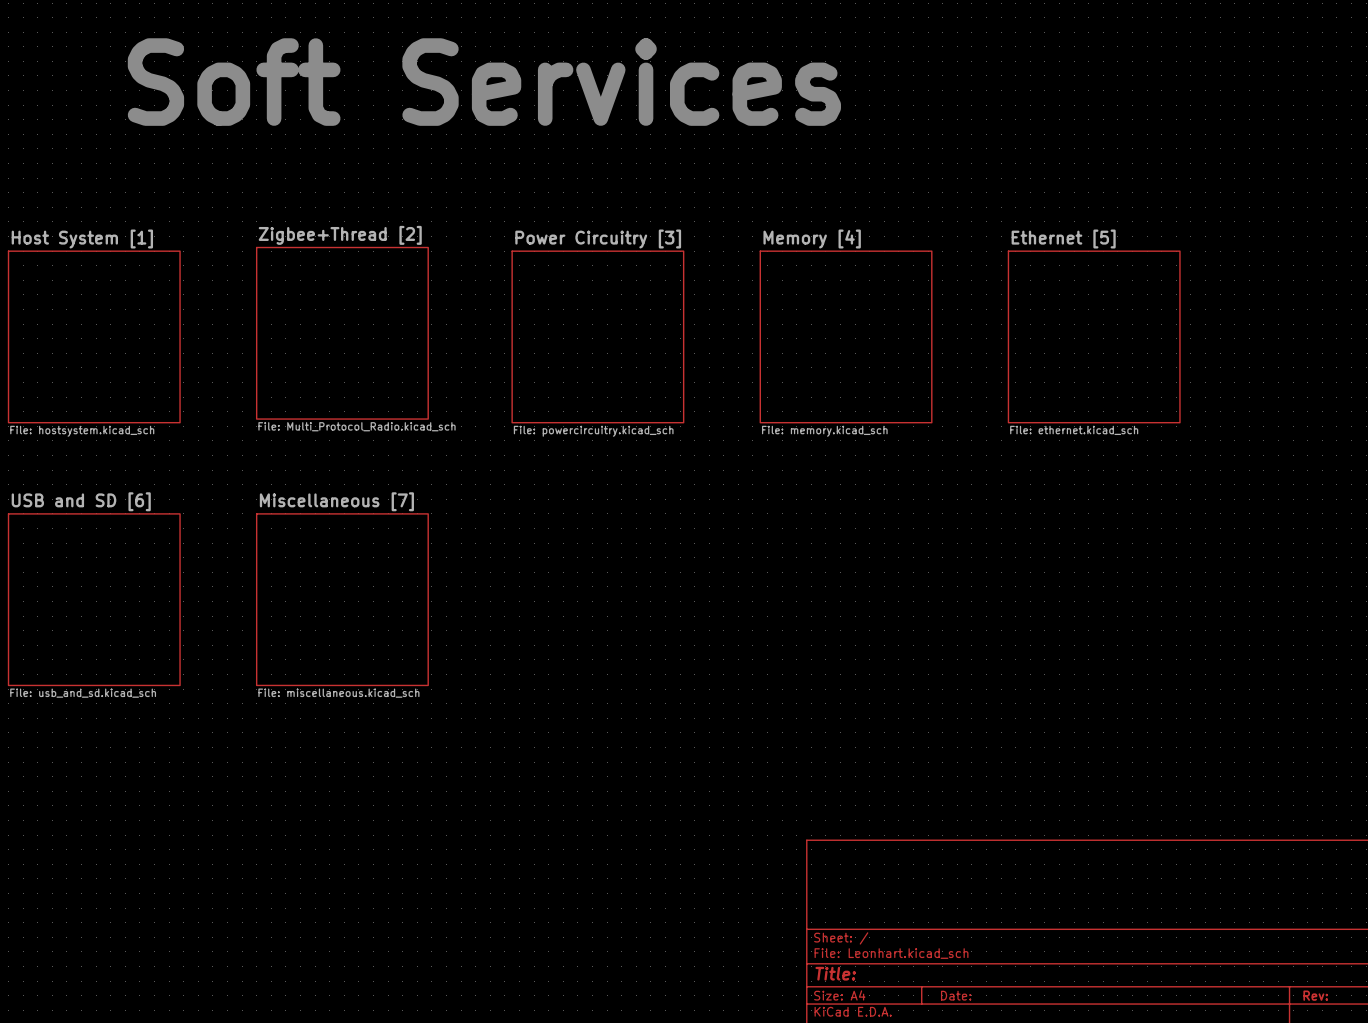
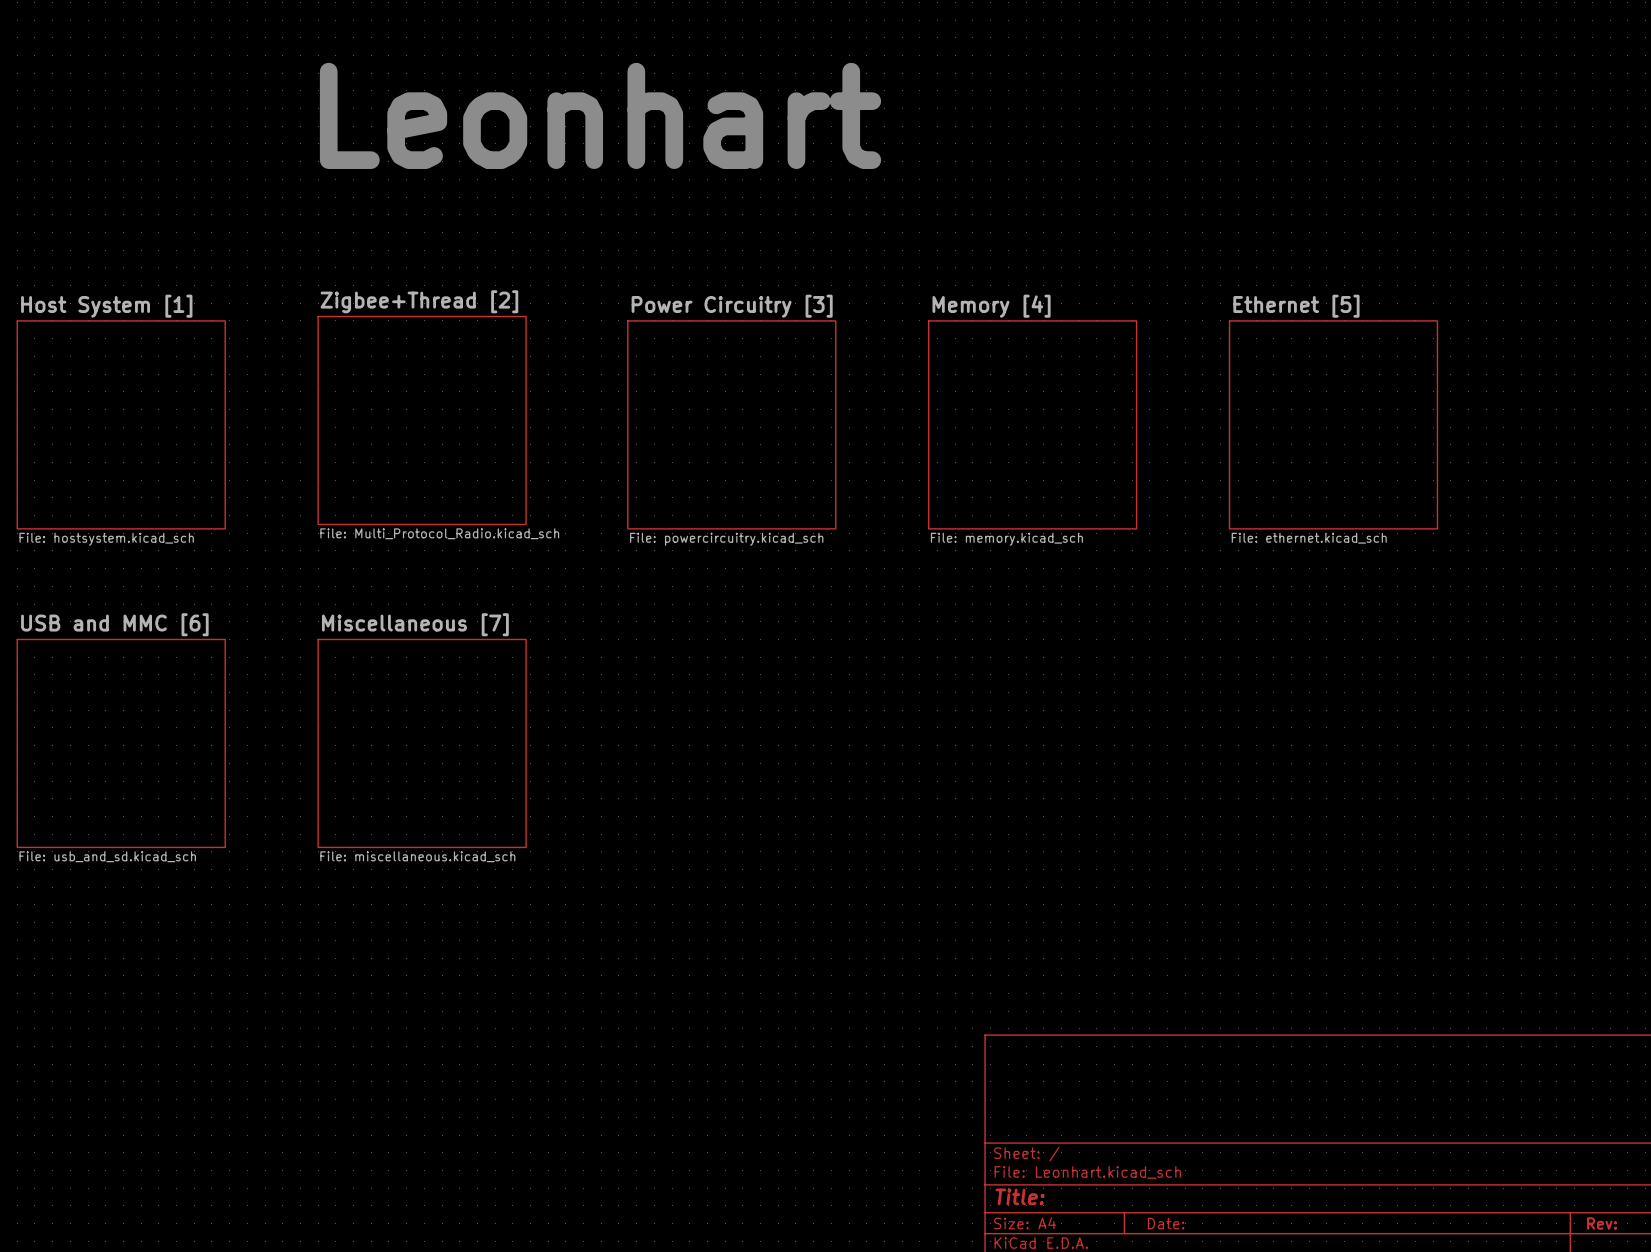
text: Soft Services (484, 82) -> Leonhart (600, 115)
sheet USB and SD [6] name: USB and SD [6] (81, 501) -> USB and MMC [6] (114, 624)

